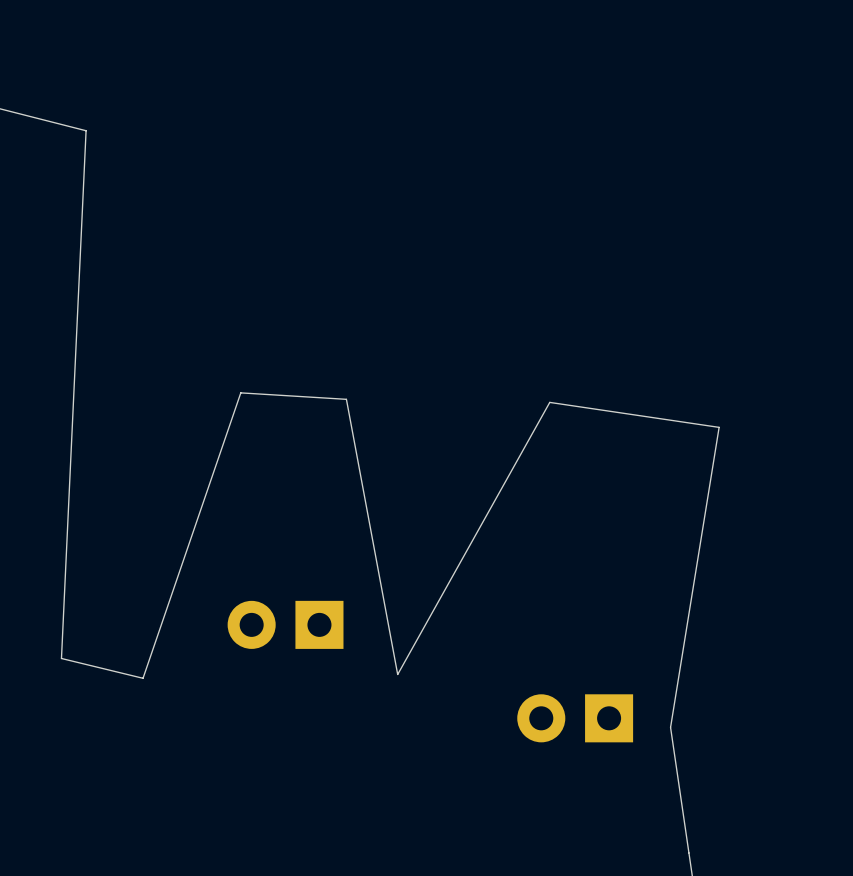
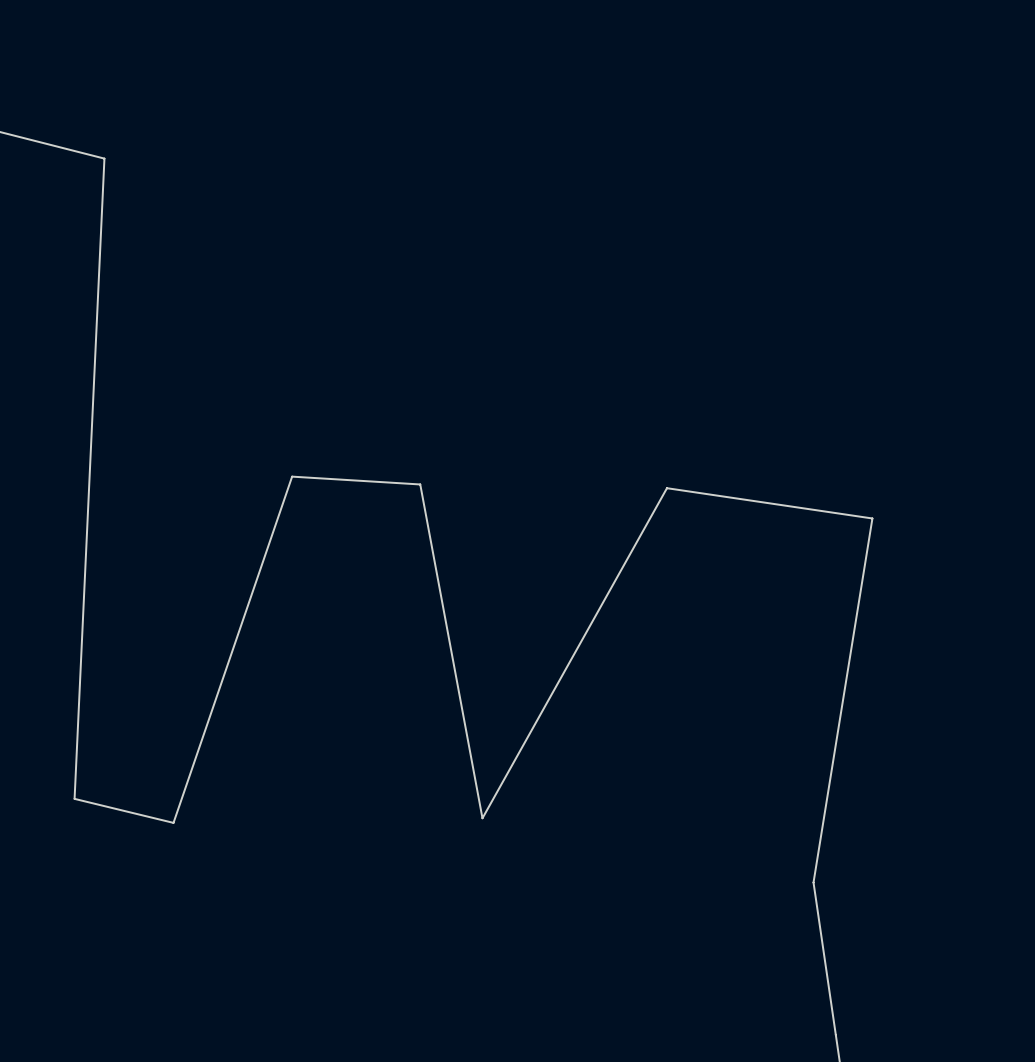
part: (285, 624) -> none
part: (575, 718) -> none

